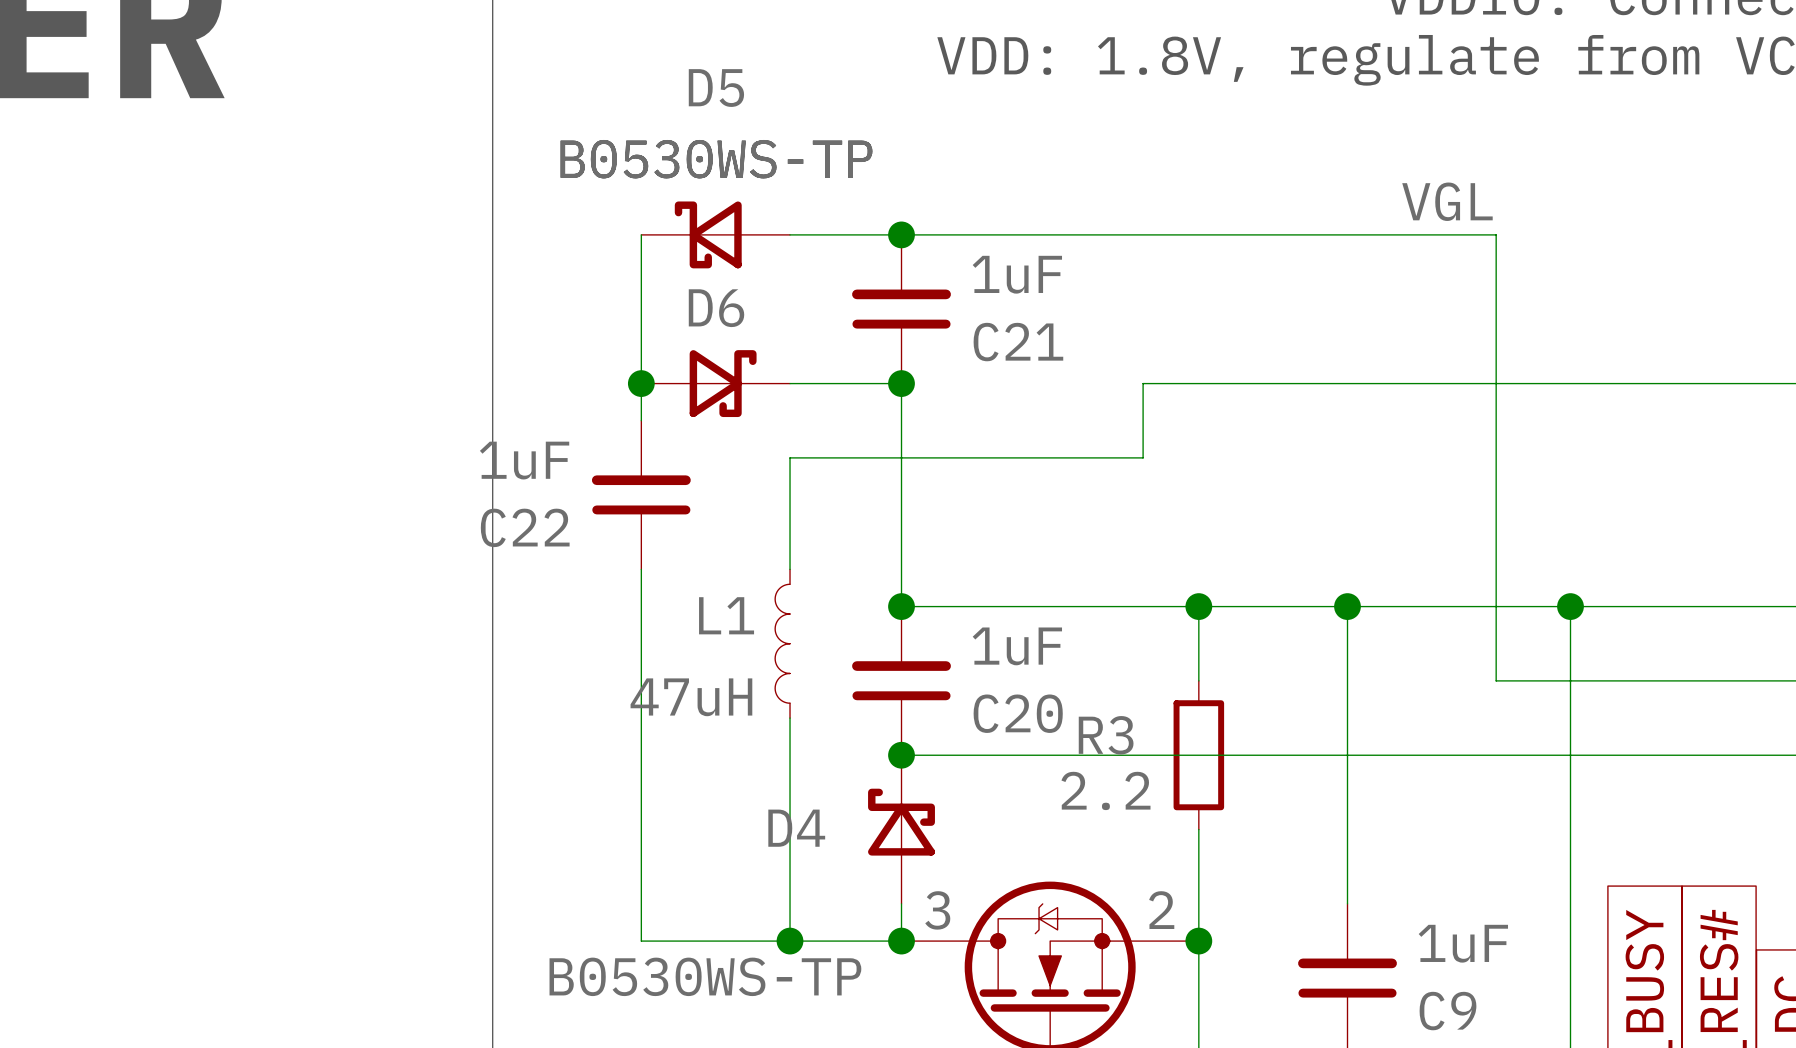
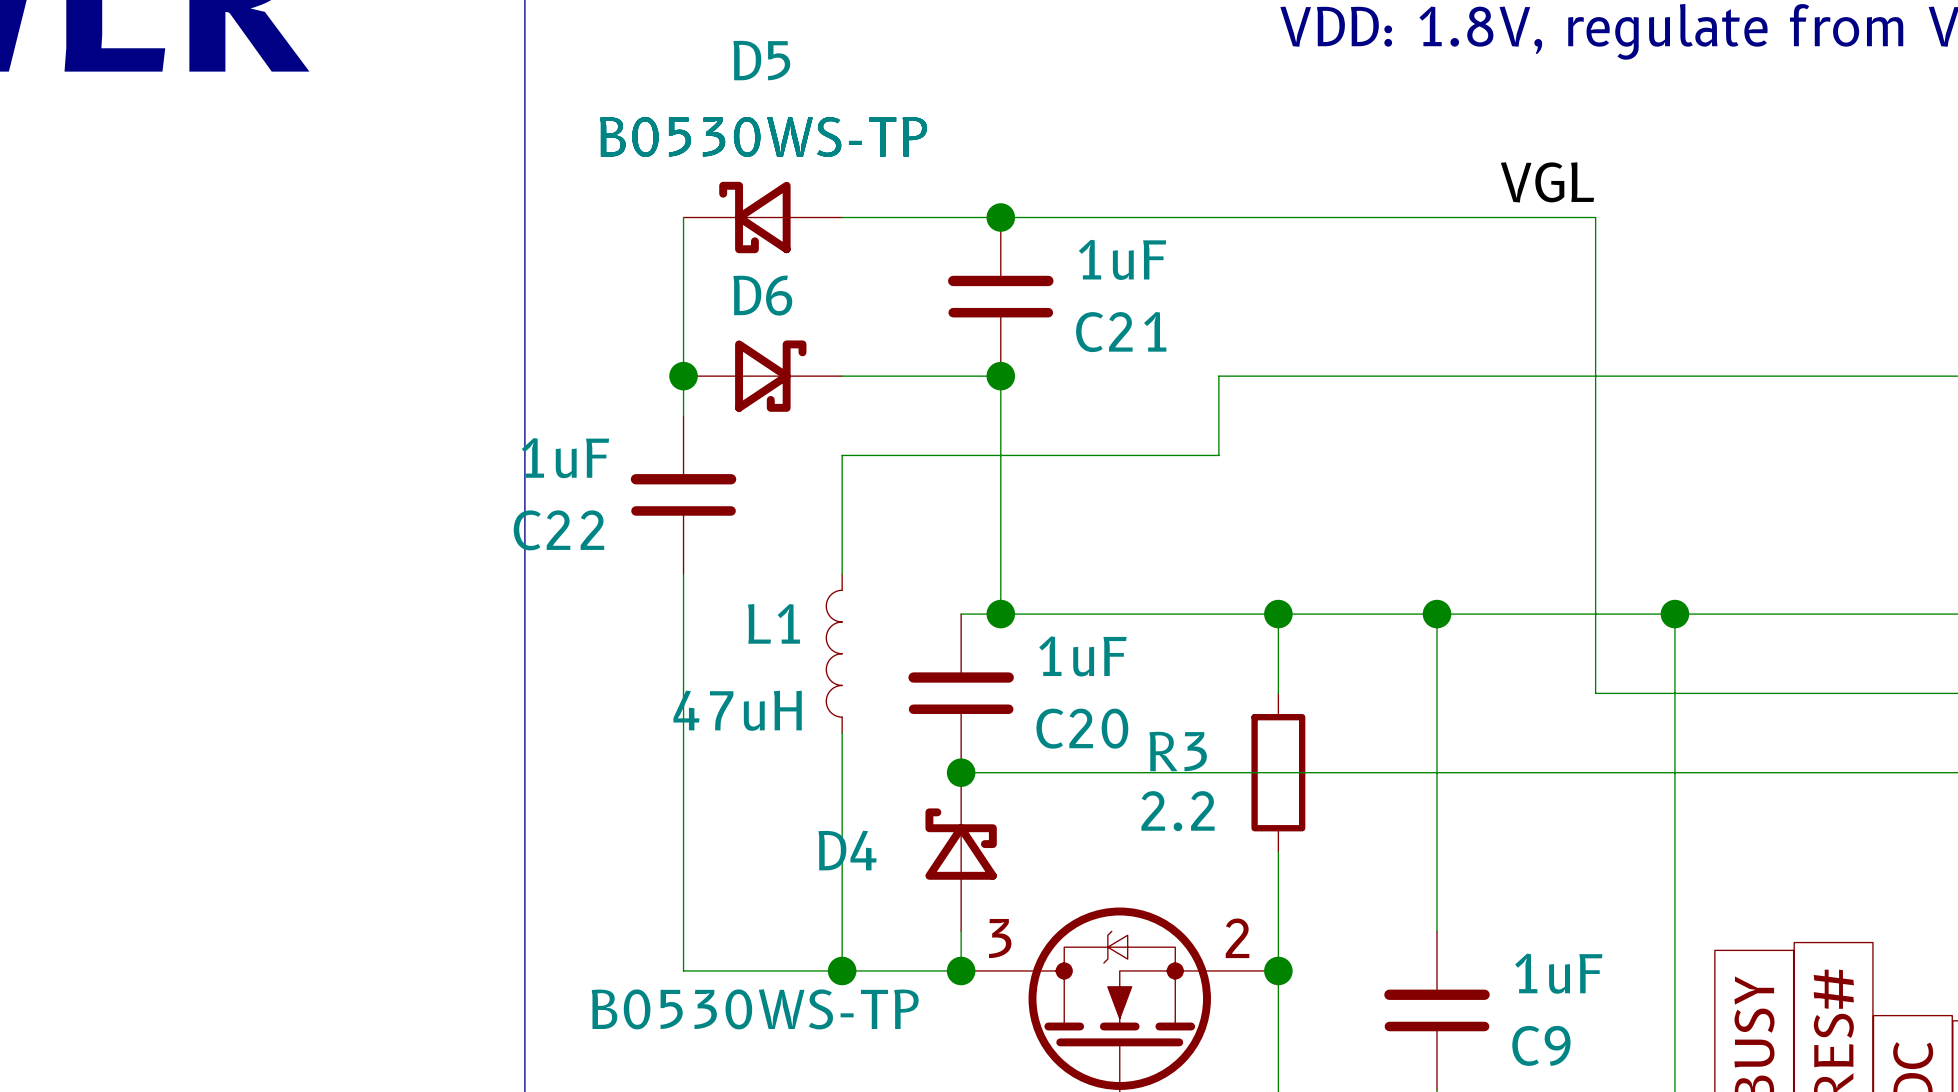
junction position: (901, 234) -> (1000, 217)
C21 position: (901, 309) -> (1000, 296)
wire: (901, 383) (901, 606) -> (961, 376) (1000, 376) (1000, 614)
junction position: (901, 383) -> (1000, 376)
junction position: (901, 606) -> (1000, 614)

